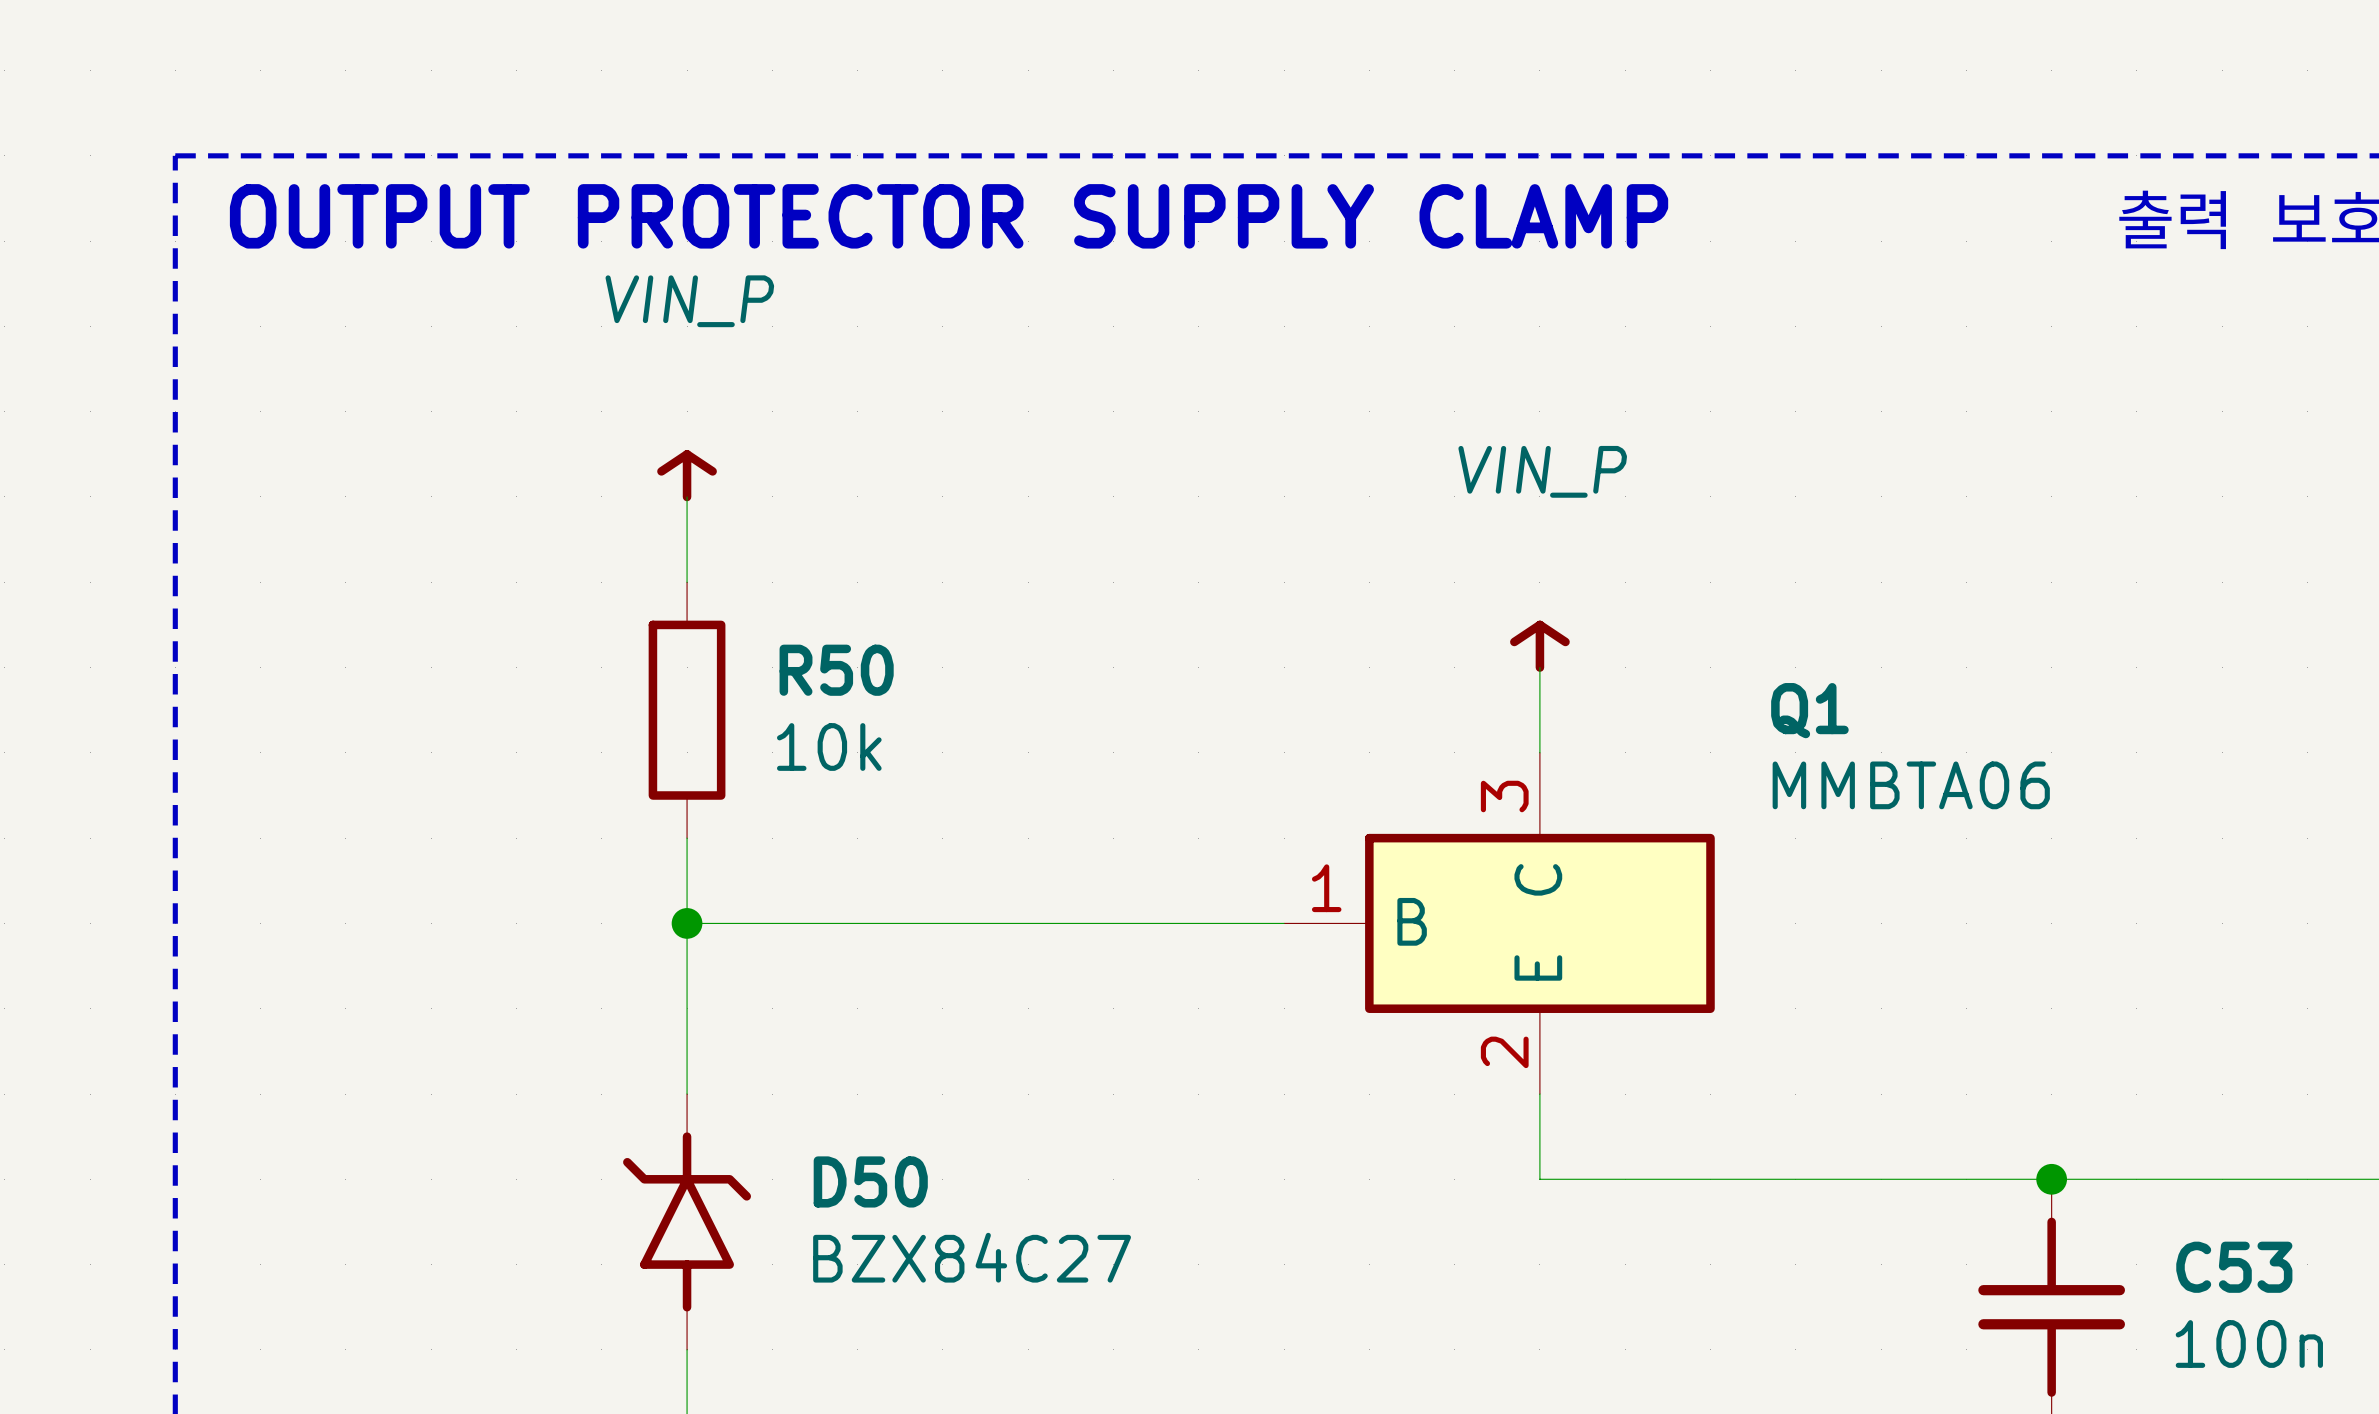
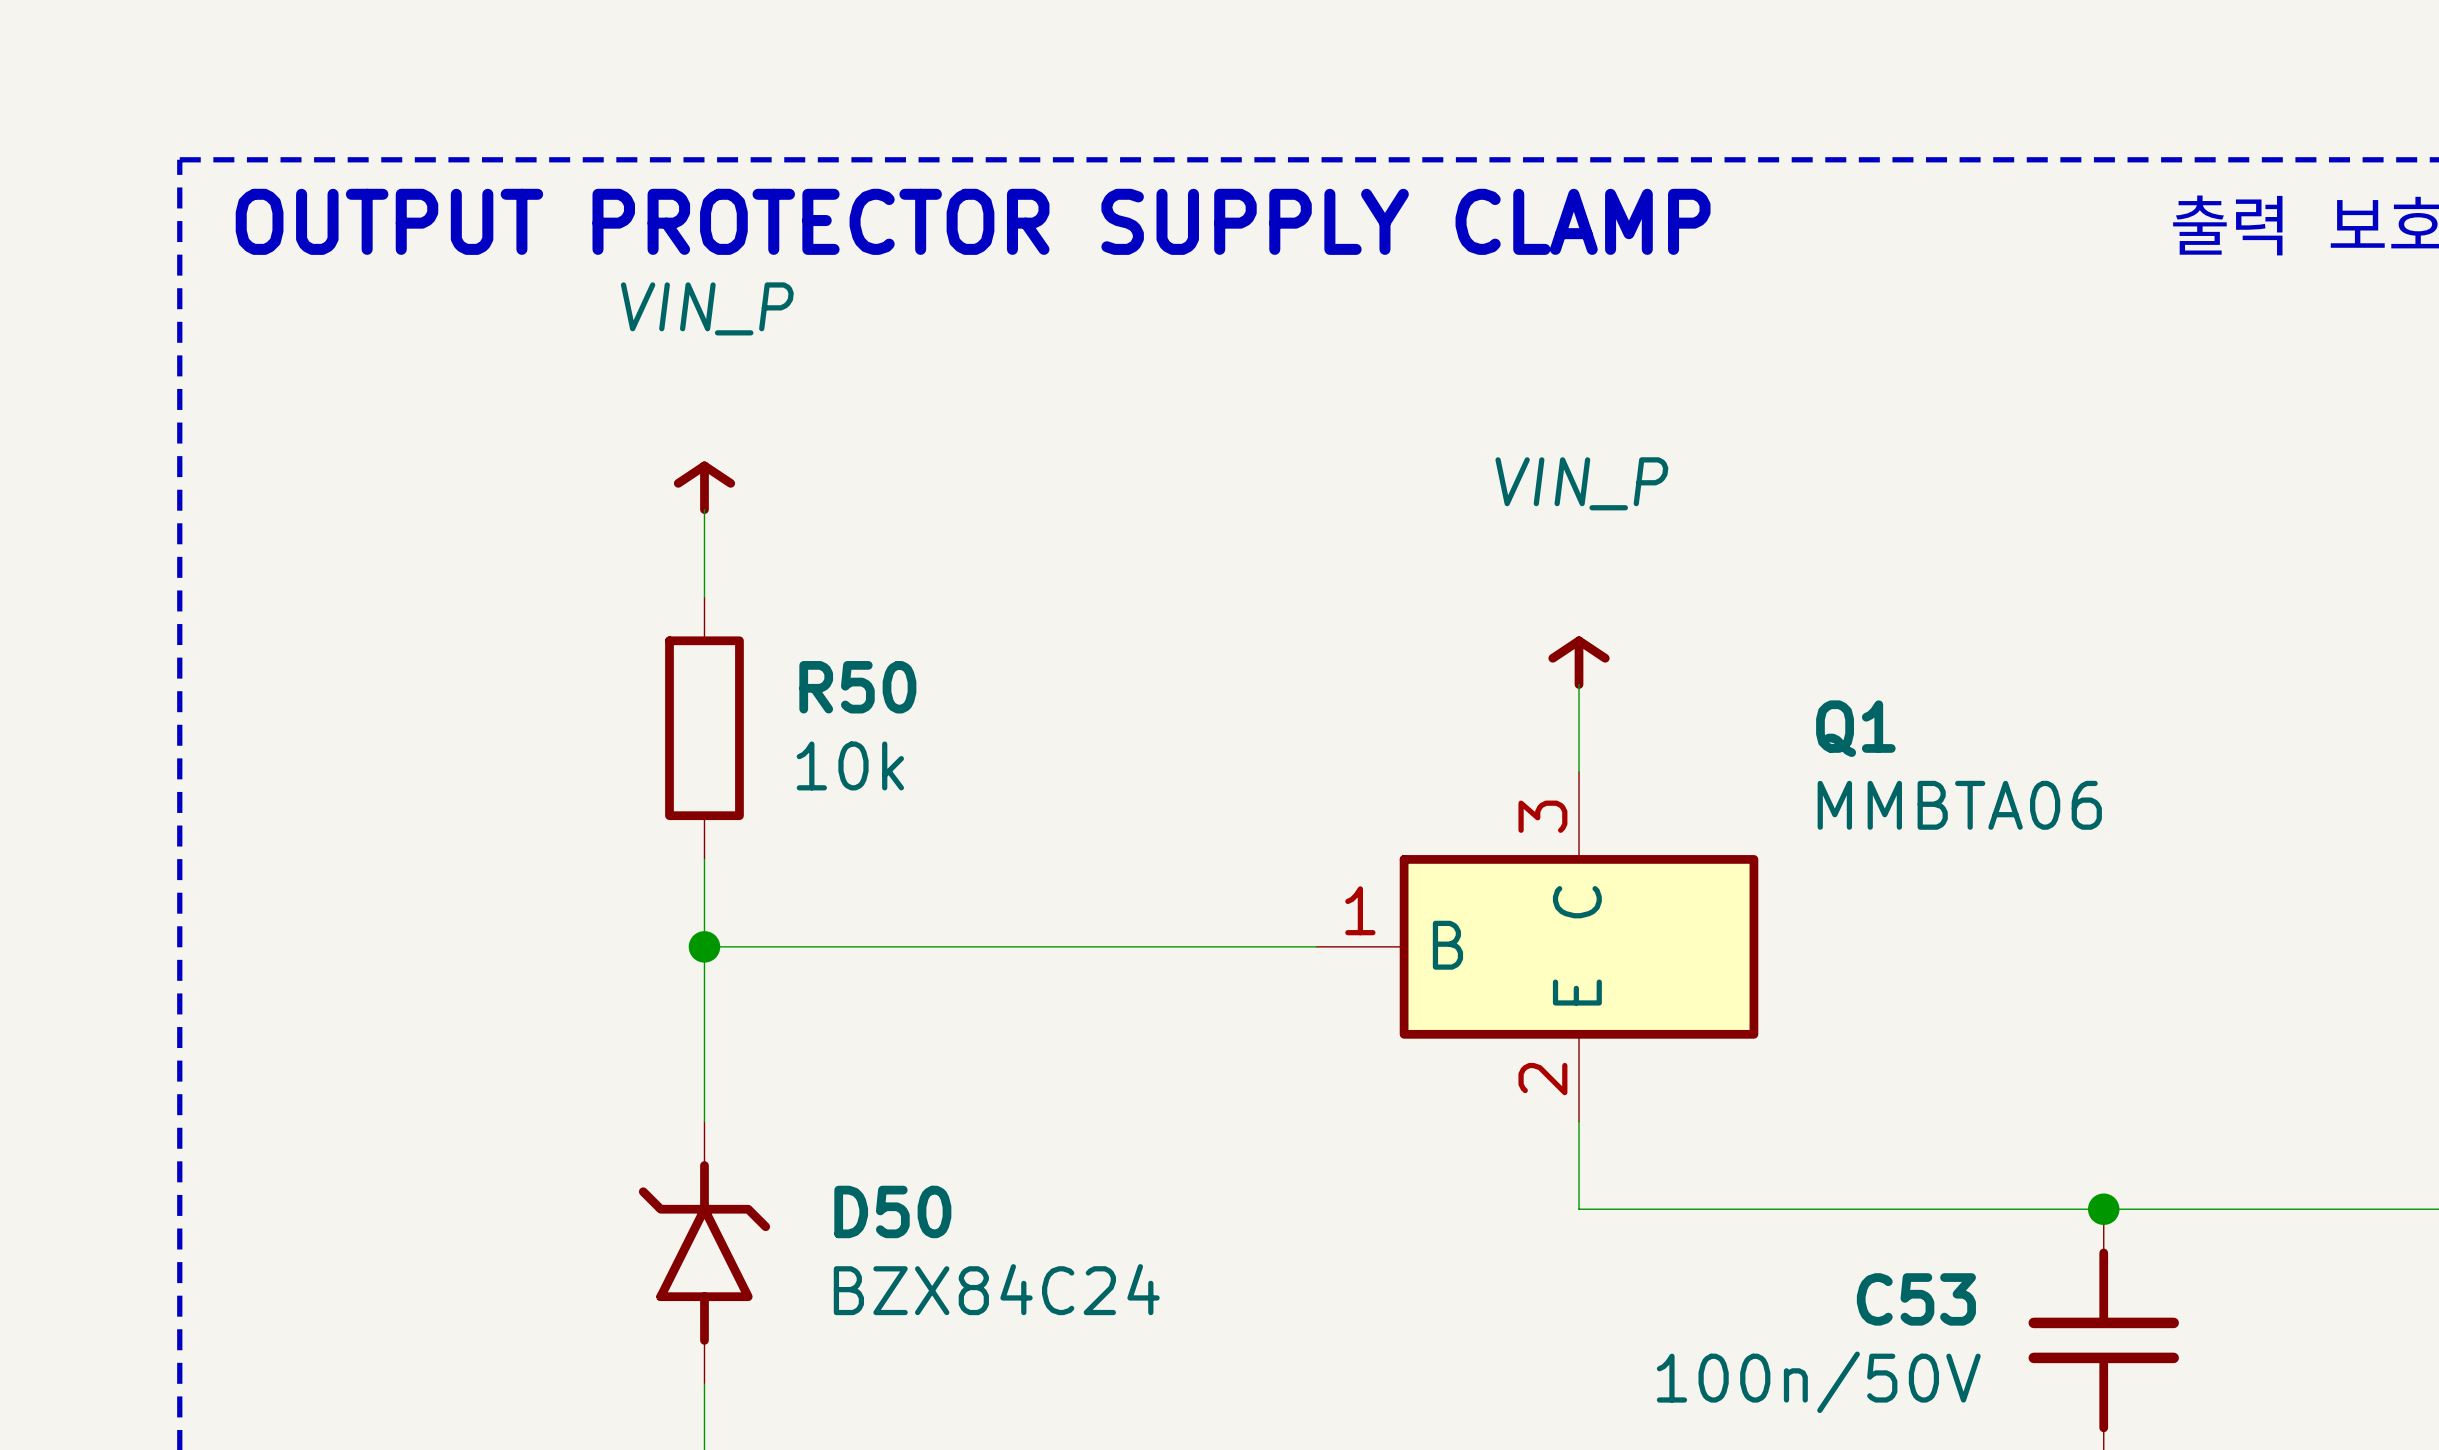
D50 value: BZX84C27 (972, 1257) -> BZX84C24 (996, 1289)
C53 name position: C53 (2234, 1267) -> C53 (1916, 1299)
C53 value: 100n (2249, 1344) -> 100n/50V (1818, 1382)

